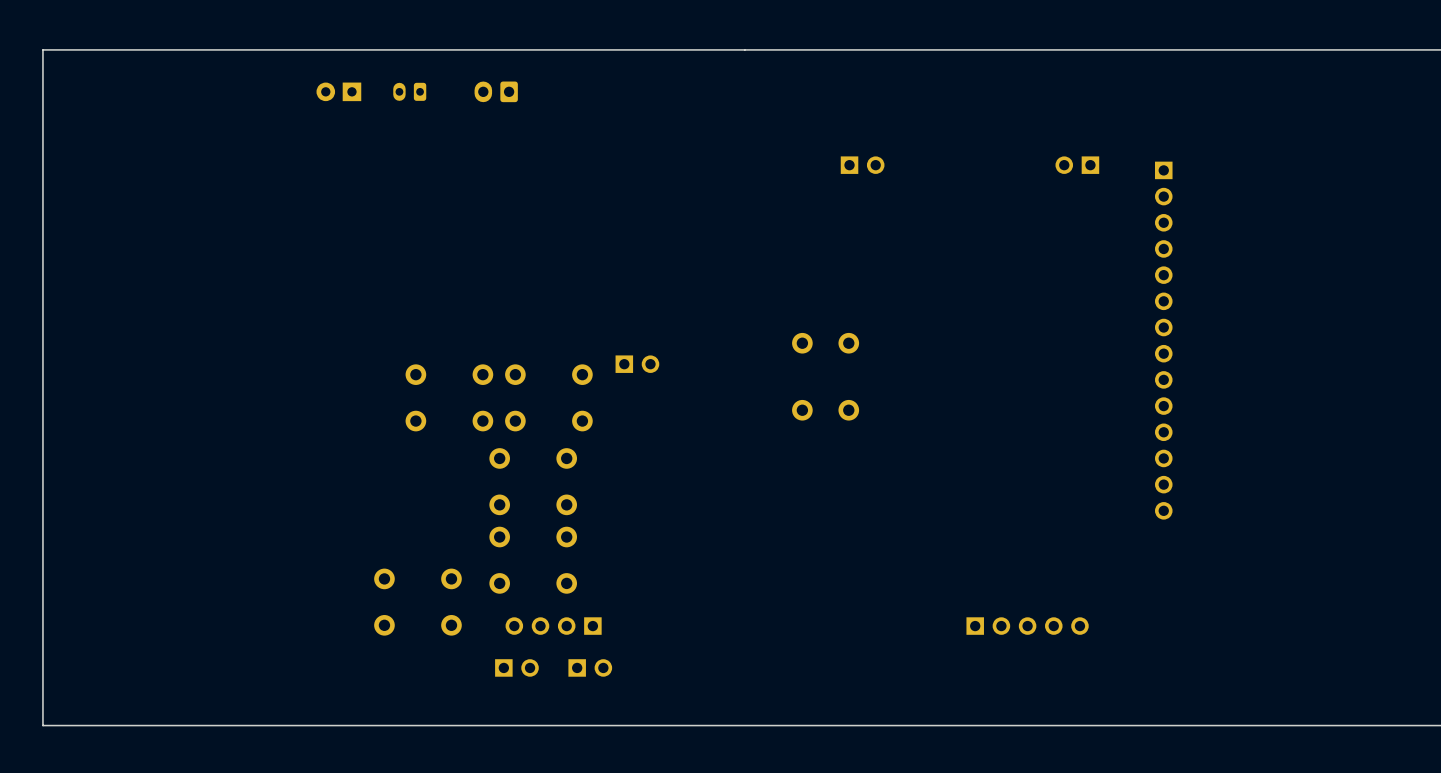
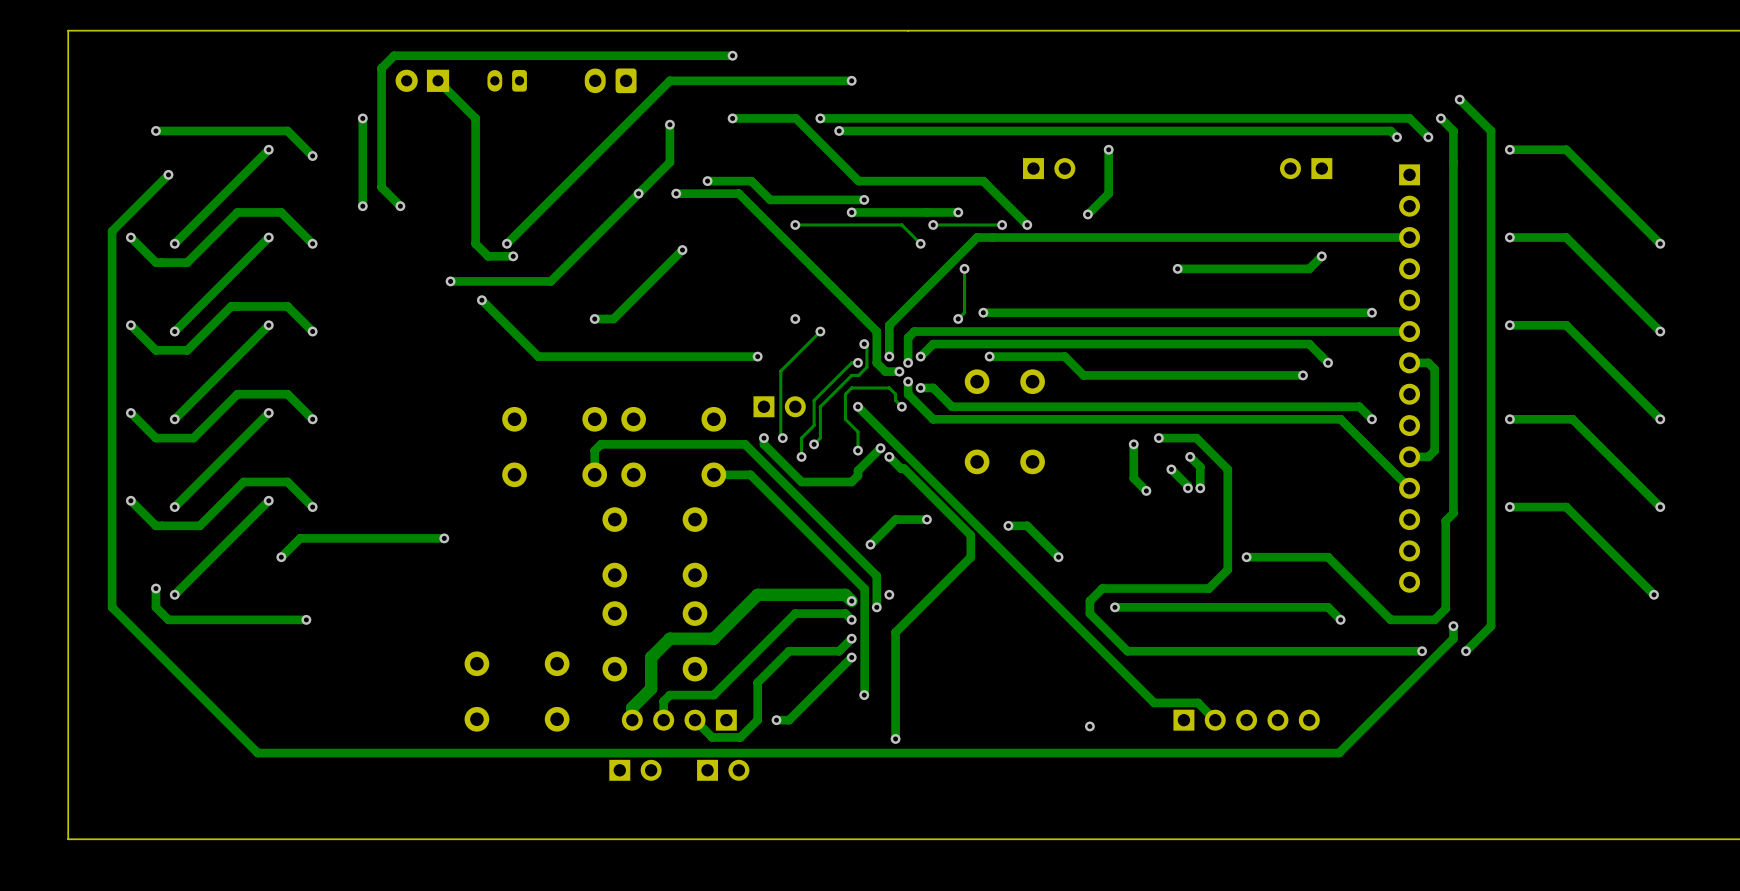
track: none -> (732, 55) (394, 55) (381, 68) (381, 187) (400, 206)
via: none -> (732, 55)
track: none -> (438, 80) (475, 118) (475, 243) (488, 256) (513, 256)
track: none -> (851, 80) (669, 80) (506, 243)
via: none -> (851, 80)
track: none -> (1459, 99) (1491, 130) (1491, 626) (1465, 651)
via: none -> (1459, 99)
track: none -> (362, 118) (362, 206)
via: none -> (362, 118)
track: none -> (732, 118) (796, 118) (858, 181) (983, 181) (1027, 224)
via: none -> (732, 118)
track: none -> (820, 118) (1409, 118) (1428, 137)
via: none -> (820, 118)
track: none -> (1440, 118) (1453, 130) (1453, 513) (1445, 521) (1445, 608) (1434, 619) (1390, 619) (1328, 557) (1246, 557)
via: none -> (1440, 118)
track: none -> (669, 124) (669, 162) (550, 281) (450, 281)
via: none -> (669, 124)
track: none -> (155, 130) (287, 130) (312, 156)
via: none -> (155, 130)
track: none -> (839, 130) (1390, 130) (1397, 137)
via: none -> (839, 130)
via: none -> (1397, 137)
via: none -> (1428, 137)
track: none -> (268, 149) (174, 243)
via: none -> (268, 149)
track: none -> (1108, 149) (1108, 193) (1087, 214)
via: none -> (1108, 149)
track: none -> (1509, 149) (1566, 149) (1660, 243)
via: none -> (1509, 149)
via: none -> (312, 156)
track: none -> (168, 174) (112, 231) (112, 607) (257, 753) (1339, 753) (1453, 638) (1453, 626)
via: none -> (168, 174)
track: none -> (707, 181) (751, 181) (770, 199) (864, 199)
via: none -> (707, 181)
via: none -> (638, 193)
track: none -> (676, 193) (738, 193) (876, 331) (876, 362) (885, 371) (899, 371)
via: none -> (676, 193)
via: none -> (864, 199)
via: none -> (362, 206)
via: none -> (400, 206)
via: none -> (851, 212)
track: none -> (958, 212) (851, 212)
via: none -> (958, 212)
via: none -> (1087, 214)
track: none -> (795, 224) (901, 224) (920, 243)
via: none -> (795, 224)
via: none -> (933, 224)
track: none -> (1002, 224) (933, 224)
via: none -> (1002, 224)
via: none -> (1027, 224)
track: none -> (130, 237) (155, 262) (187, 262) (237, 212) (281, 212) (312, 243)
via: none -> (130, 237)
track: none -> (268, 237) (174, 331)
via: none -> (268, 237)
track: none -> (1409, 237) (977, 237) (889, 325) (889, 356)
track: none -> (1509, 237) (1566, 237) (1660, 331)
via: none -> (1509, 237)
via: none -> (174, 243)
via: none -> (312, 243)
via: none -> (506, 243)
via: none -> (920, 243)
via: none -> (1660, 243)
track: none -> (682, 250) (613, 319) (594, 319)
via: none -> (682, 250)
via: none -> (513, 256)
track: none -> (1321, 256) (1309, 268) (1177, 268)
via: none -> (1321, 256)
track: none -> (964, 268) (964, 312) (958, 318)
via: none -> (964, 268)
via: none -> (1177, 268)
via: none -> (450, 281)
track: none -> (481, 300) (538, 356) (757, 356)
via: none -> (481, 300)
via: none -> (983, 312)
track: none -> (1371, 312) (983, 312)
via: none -> (1371, 312)
via: none -> (594, 319)
via: none -> (795, 319)
via: none -> (958, 318)
track: none -> (130, 325) (155, 350) (187, 350) (231, 306) (287, 306) (312, 331)
via: none -> (130, 325)
track: none -> (268, 325) (174, 419)
via: none -> (268, 325)
track: none -> (1509, 325) (1566, 325) (1660, 419)
via: none -> (1509, 325)
via: none -> (174, 331)
via: none -> (312, 331)
track: none -> (820, 331) (780, 371) (780, 436) (782, 438)
via: none -> (820, 331)
track: none -> (1409, 331) (914, 331) (908, 337) (908, 362)
via: none -> (1660, 331)
track: none -> (864, 344) (866, 346) (866, 367) (858, 375) (851, 375) (820, 406) (820, 438) (814, 444)
via: none -> (864, 344)
via: none -> (757, 356)
via: none -> (889, 356)
track: none -> (920, 356) (933, 344) (1309, 344) (1328, 362)
via: none -> (920, 356)
track: none -> (989, 356) (1064, 356) (1083, 375) (1303, 375)
via: none -> (989, 356)
track: none -> (857, 362) (851, 362) (814, 400) (814, 425) (801, 438) (801, 456)
via: none -> (857, 362)
via: none -> (908, 362)
via: none -> (1328, 362)
track: none -> (1409, 362) (1428, 362) (1434, 369) (1434, 450) (1428, 456) (1409, 456)
via: none -> (899, 371)
via: none -> (1303, 375)
track: none -> (908, 381) (908, 394) (933, 419) (1340, 419) (1409, 488)
via: none -> (908, 381)
track: none -> (920, 387) (933, 387) (952, 406) (1359, 406) (1371, 419)
via: none -> (920, 387)
track: none -> (857, 406) (1154, 702) (1197, 702) (1215, 720)
via: none -> (857, 406)
track: none -> (901, 406) (895, 400) (895, 394) (889, 387) (851, 387) (845, 394) (845, 419) (857, 431) (857, 450)
via: none -> (901, 406)
track: none -> (130, 413) (155, 438) (193, 438) (237, 394) (287, 394) (312, 419)
via: none -> (130, 413)
track: none -> (268, 413) (174, 507)
via: none -> (268, 413)
via: none -> (174, 419)
via: none -> (312, 419)
via: none -> (1371, 419)
track: none -> (1509, 419) (1572, 419) (1660, 507)
via: none -> (1509, 419)
via: none -> (1660, 419)
track: none -> (763, 438) (763, 444) (801, 481) (851, 481) (857, 475) (857, 470) (880, 448)
via: none -> (763, 438)
via: none -> (782, 438)
track: none -> (1158, 438) (1196, 438) (1227, 469) (1227, 569) (1209, 588) (1102, 588) (1089, 601) (1089, 613) (1127, 651) (1422, 651)
via: none -> (1158, 438)
via: none -> (814, 444)
track: none -> (1133, 444) (1133, 478) (1146, 490)
via: none -> (1133, 444)
via: none -> (880, 448)
via: none -> (857, 450)
via: none -> (801, 456)
track: none -> (889, 456) (901, 468) (904, 468) (970, 535) (970, 557) (895, 632) (895, 738) (898, 736)
via: none -> (889, 456)
track: none -> (1190, 456) (1200, 467) (1200, 488)
via: none -> (1190, 456)
track: none -> (1171, 469) (1187, 488)
via: none -> (1171, 469)
track: none -> (594, 474) (594, 450) (600, 444) (745, 444) (876, 575) (876, 607)
track: none -> (713, 474) (750, 474) (864, 588) (864, 695)
via: none -> (1187, 488)
via: none -> (1200, 488)
via: none -> (1146, 490)
track: none -> (130, 500) (155, 525) (199, 525) (243, 481) (287, 481) (312, 507)
via: none -> (130, 500)
track: none -> (268, 500) (174, 594)
via: none -> (268, 500)
via: none -> (174, 507)
via: none -> (312, 507)
track: none -> (1509, 507) (1566, 507) (1654, 594)
via: none -> (1509, 507)
via: none -> (1660, 507)
track: none -> (926, 519) (895, 519) (870, 544)
via: none -> (926, 519)
track: none -> (1008, 525) (1027, 525) (1058, 557)
via: none -> (1008, 525)
track: none -> (444, 538) (300, 538) (281, 557)
via: none -> (444, 538)
via: none -> (870, 544)
via: none -> (281, 557)
via: none -> (1058, 557)
via: none -> (1246, 557)
track: none -> (155, 588) (155, 607) (168, 619) (306, 619)
via: none -> (155, 588)
via: none -> (174, 594)
via: none -> (889, 594)
via: none -> (1654, 594)
track: none -> (851, 601) (845, 594) (757, 594) (713, 638) (669, 638) (651, 657) (651, 688) (632, 707) (632, 720)
via: none -> (851, 601)
via: none -> (876, 607)
track: none -> (1114, 607) (1328, 607) (1340, 619)
via: none -> (1114, 607)
via: none -> (306, 619)
track: none -> (851, 619) (845, 613) (795, 613) (713, 695) (669, 695) (663, 701) (663, 720)
via: none -> (851, 619)
via: none -> (1340, 619)
via: none -> (1453, 626)
track: none -> (851, 638) (839, 651) (789, 651) (757, 682) (757, 720) (740, 737) (712, 737) (695, 720)
via: none -> (851, 638)
via: none -> (1422, 651)
via: none -> (1465, 651)
track: none -> (851, 657) (789, 720) (776, 720)
via: none -> (851, 657)
via: none -> (864, 695)
via: none -> (776, 720)
via: none -> (1089, 726)
via: none -> (895, 738)

